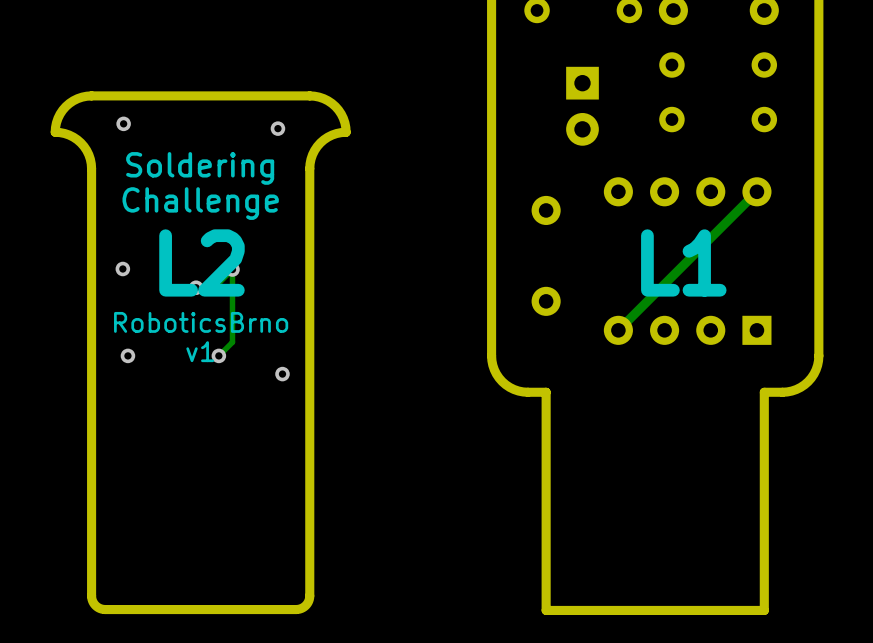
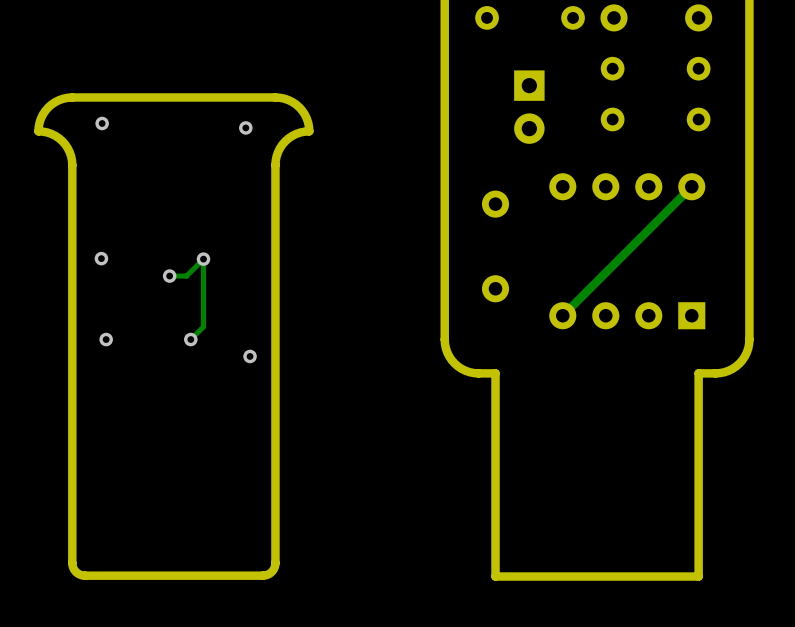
text: Soldering (200, 168) -> none
text: Challenge (200, 203) -> none
text: L2 (201, 262) -> none
text: L1 (683, 262) -> none
text: RoboticsBrno (201, 322) -> none
text: v1 (200, 351) -> none

